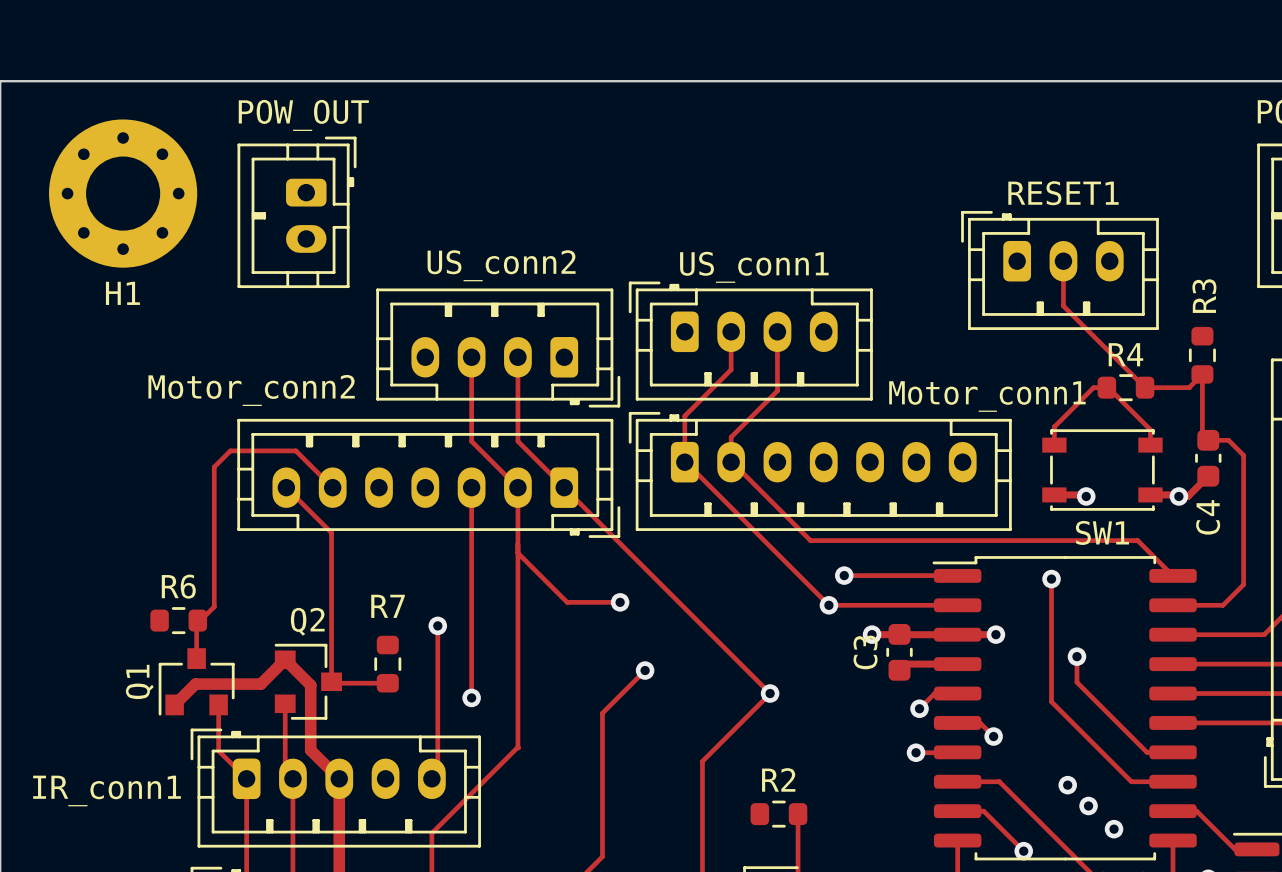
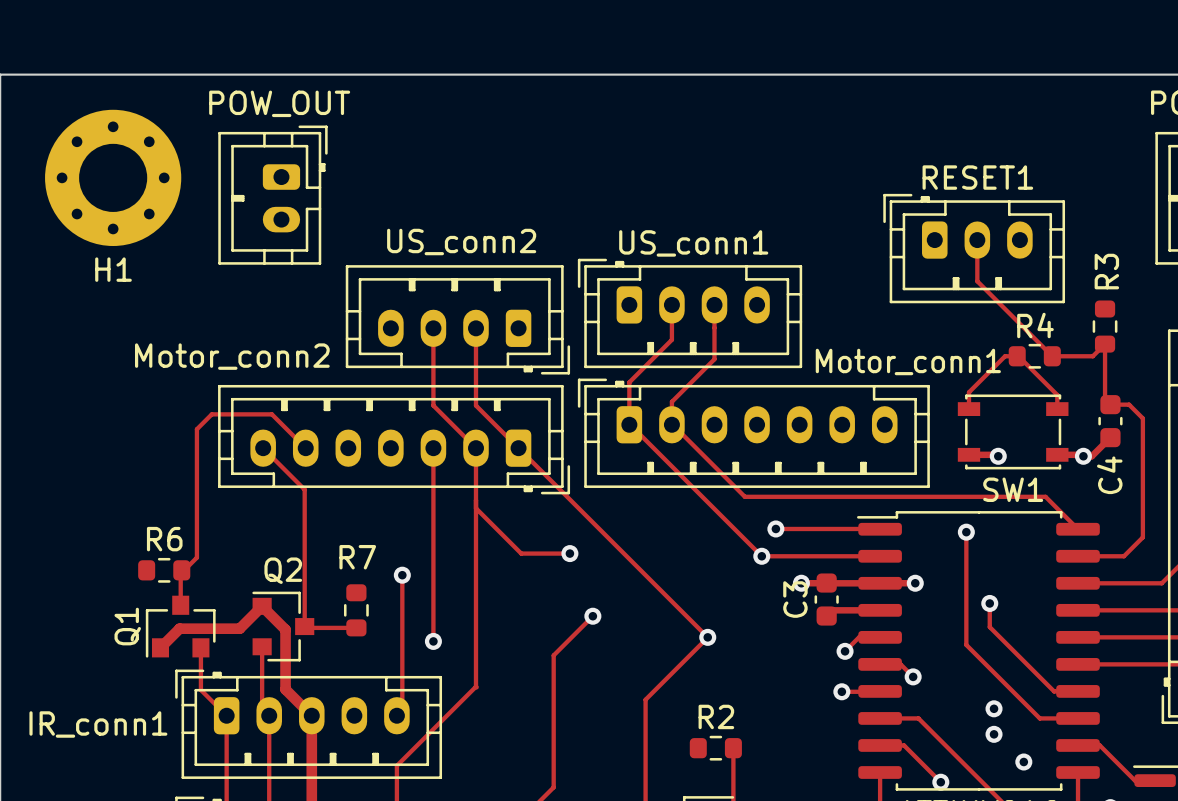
via: none -> (994, 708)
via: (1067, 785) -> none
via: none -> (994, 734)
via: (1088, 806) -> none

